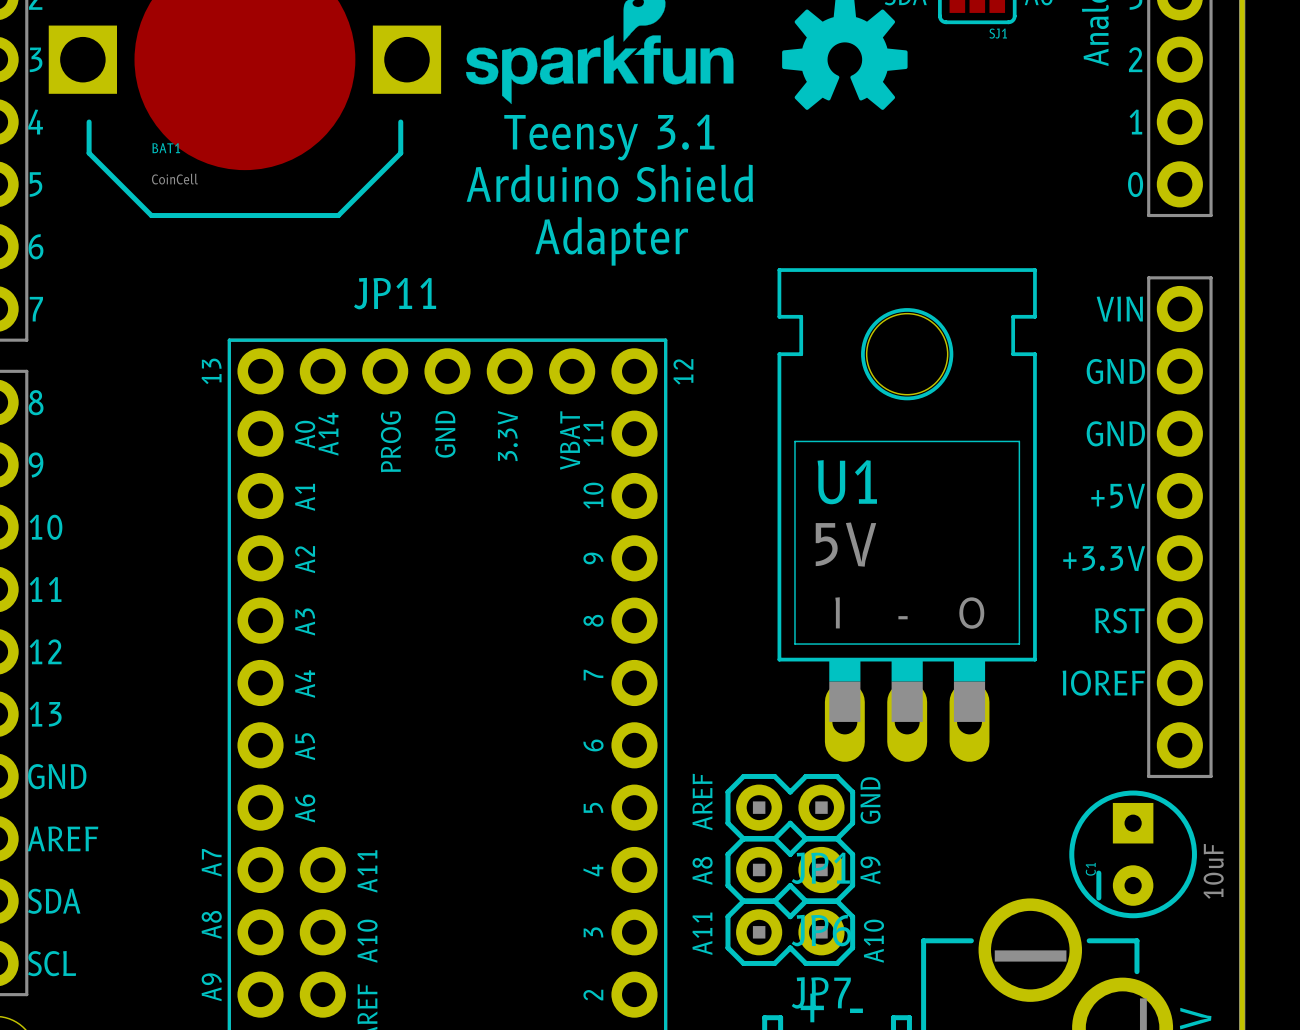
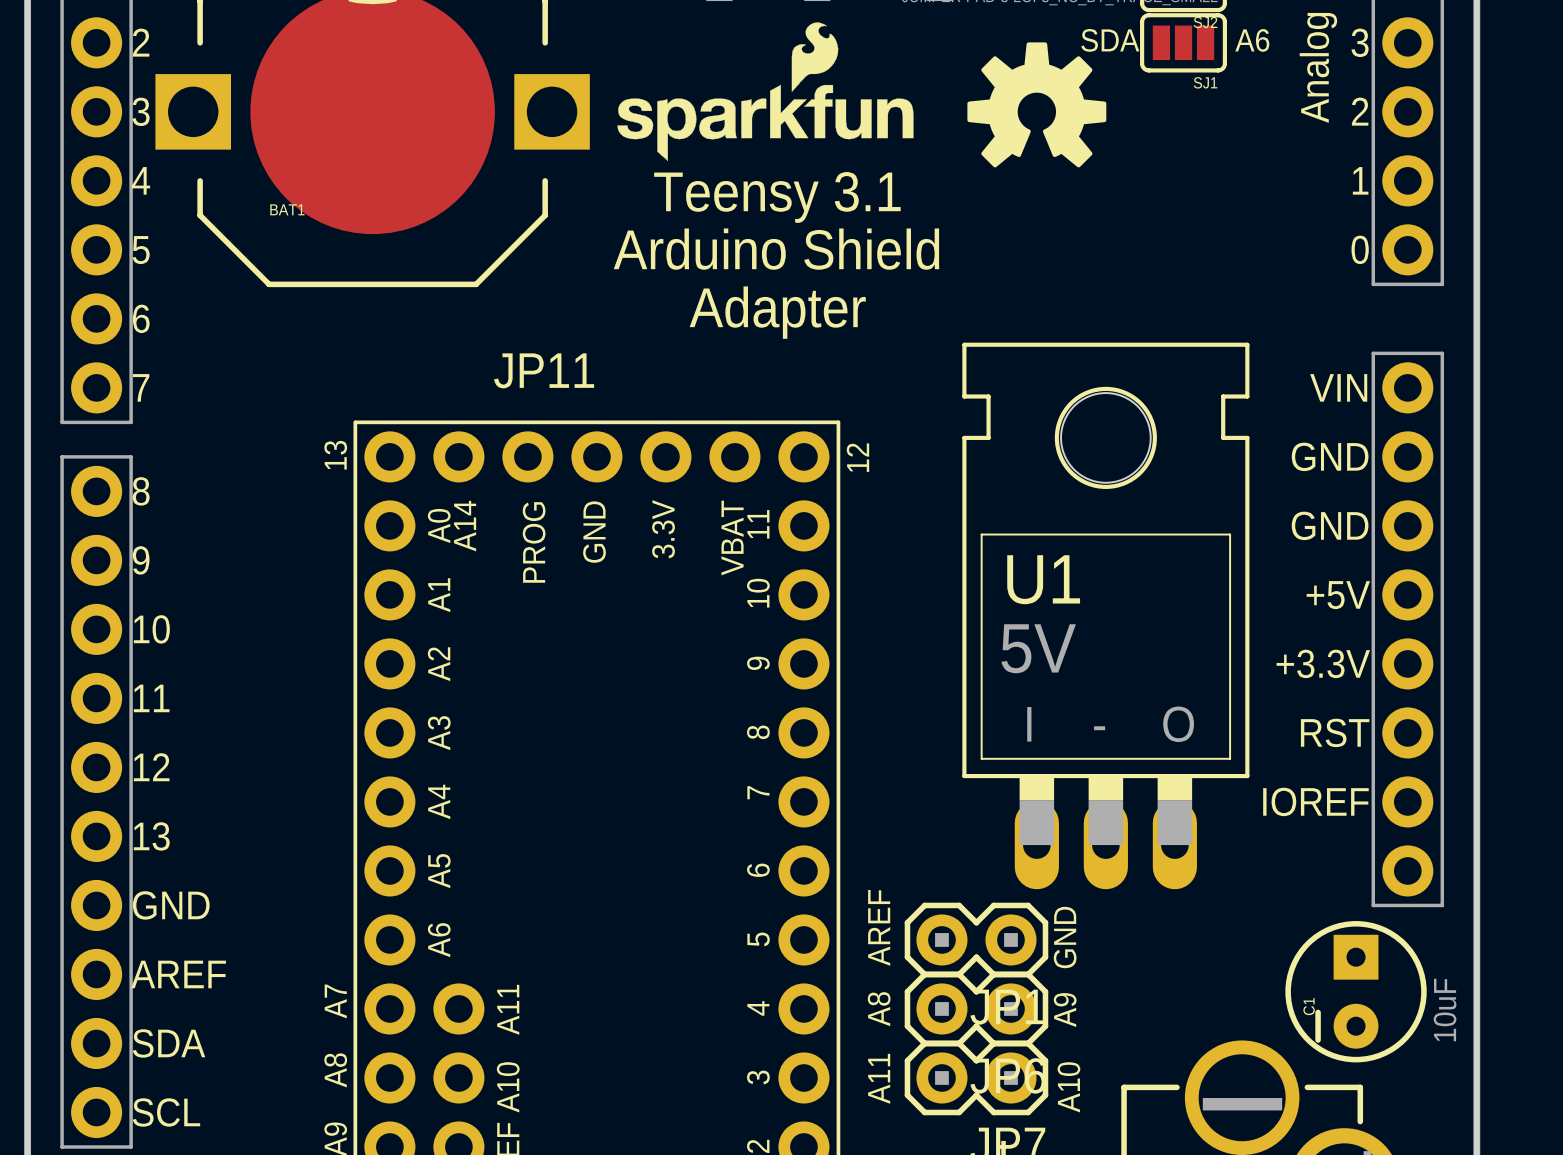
BAT1 value: CoinCell (174, 179) -> none

